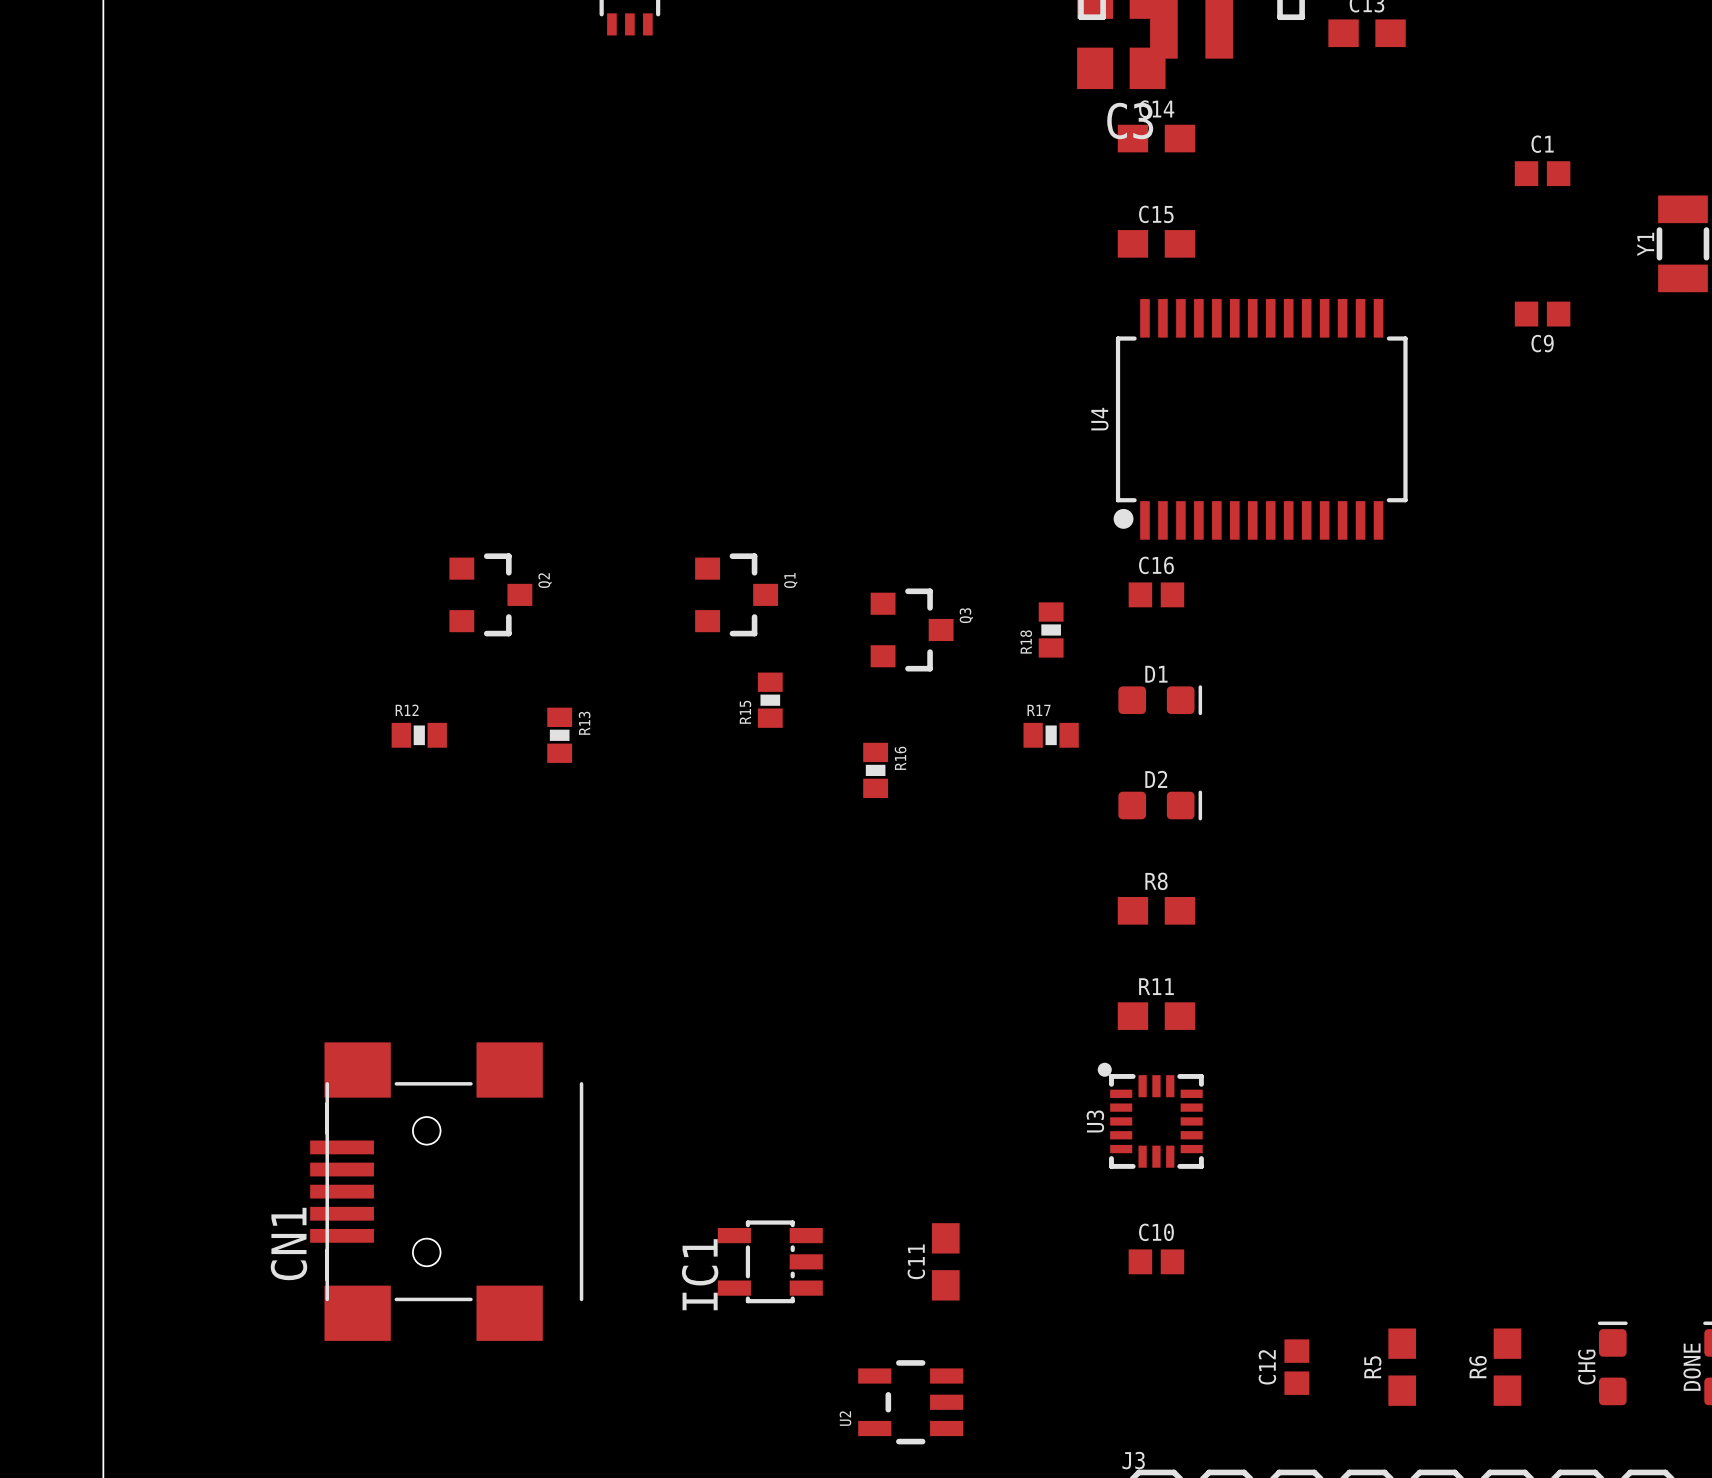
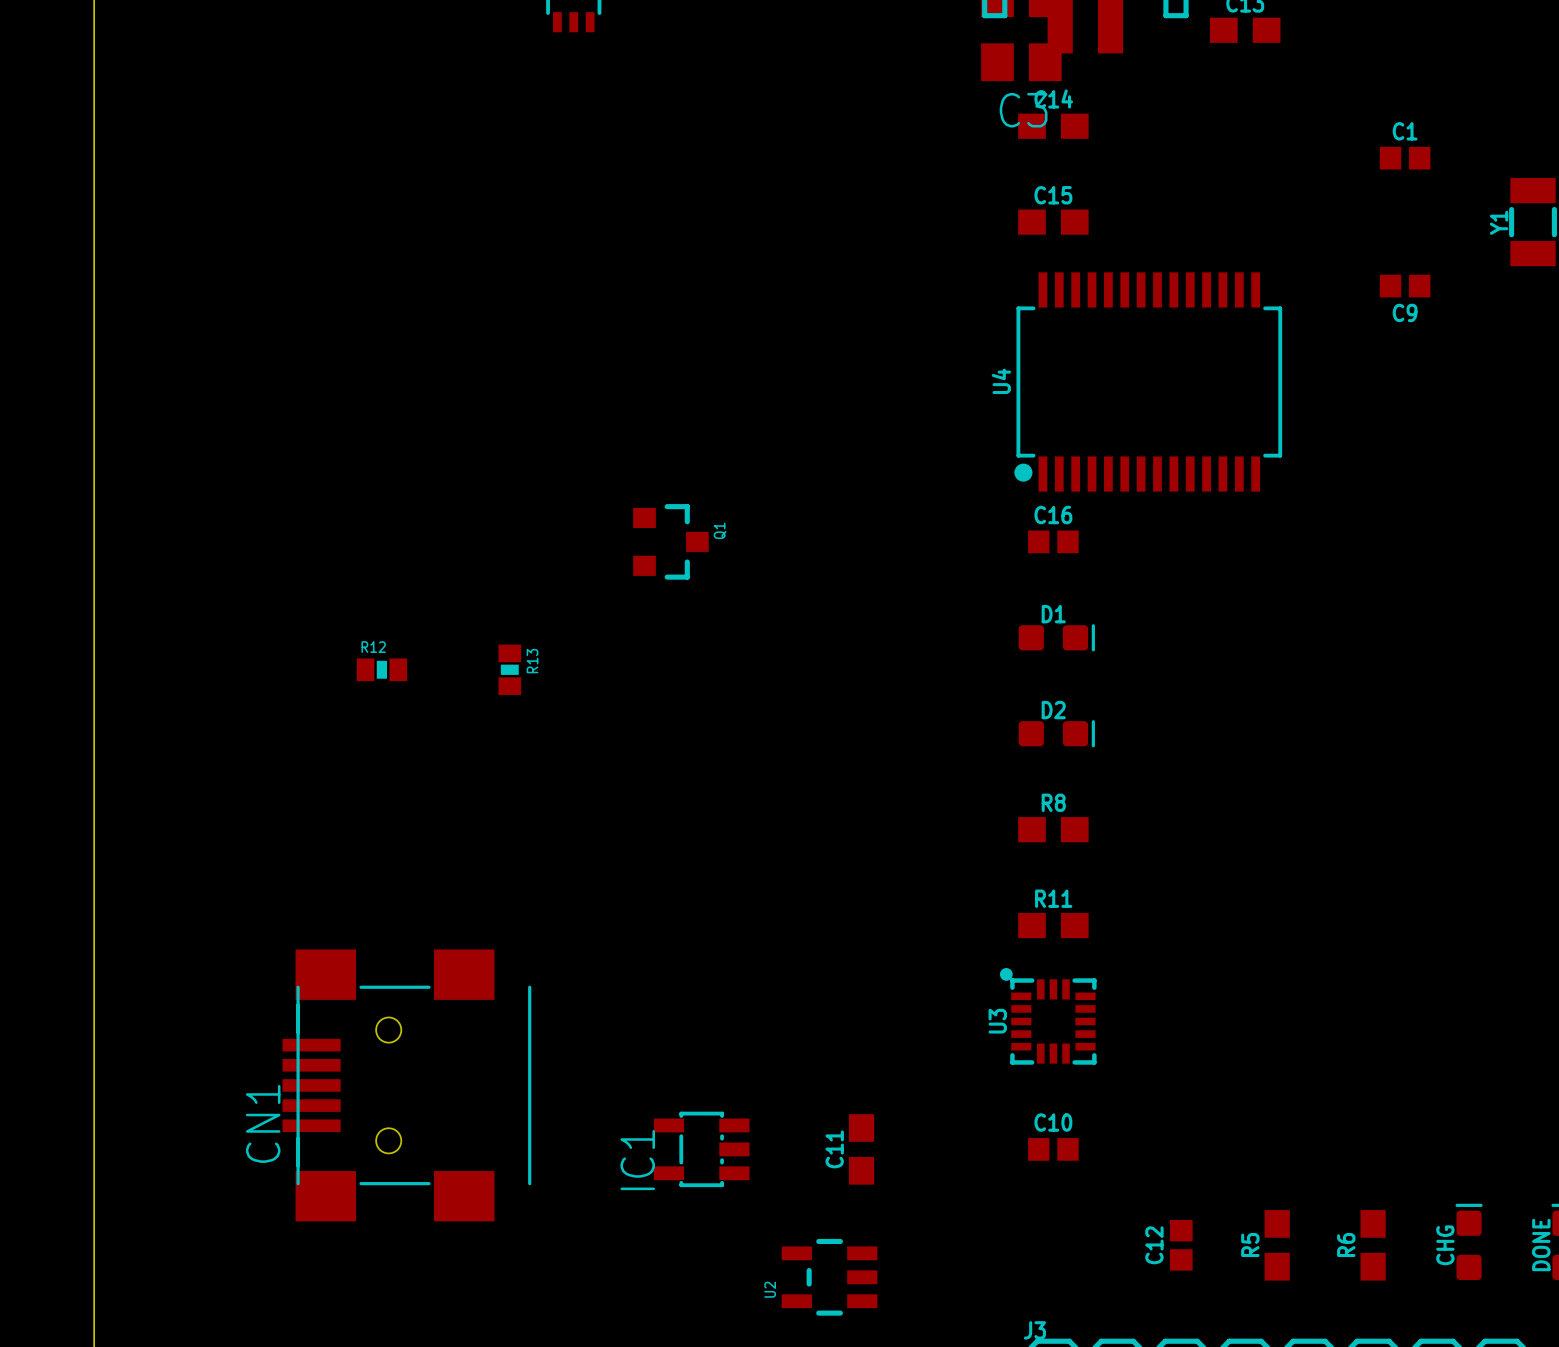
Q2: (490, 594) -> none
Q3: (912, 629) -> none
R18: (1051, 629) -> none
R15: (770, 700) -> none
R17: (1051, 735) -> none
R16: (875, 770) -> none

